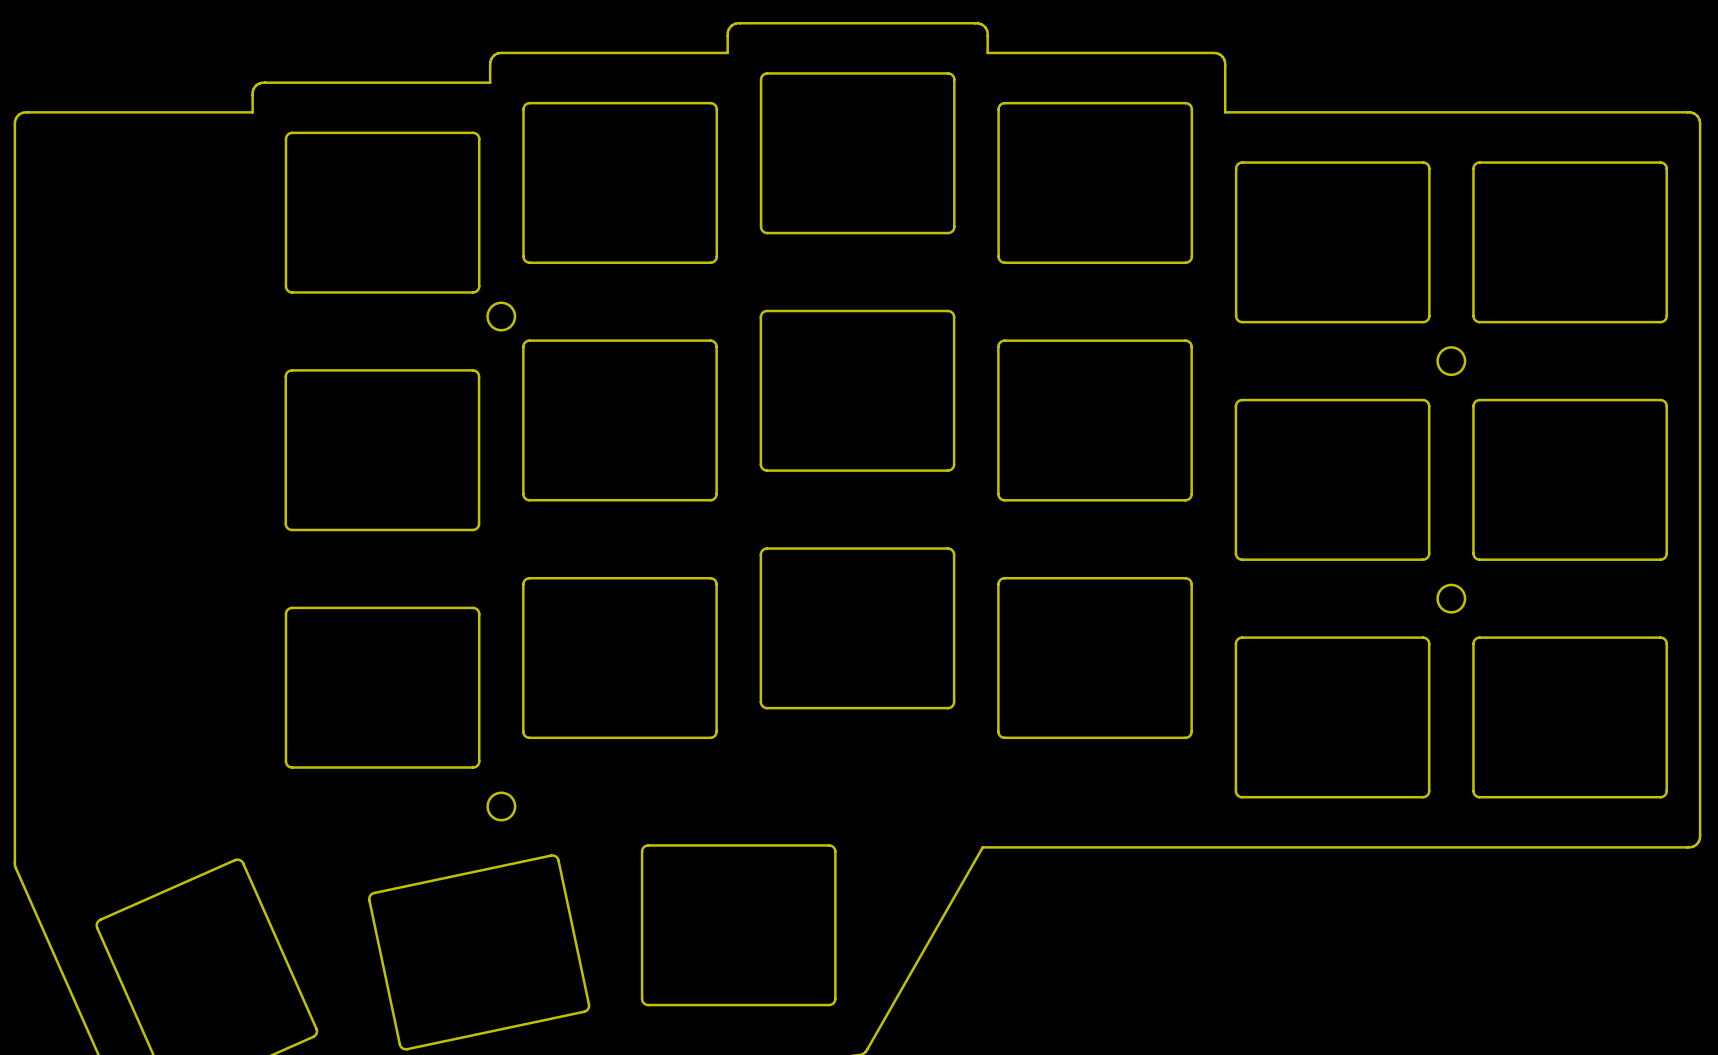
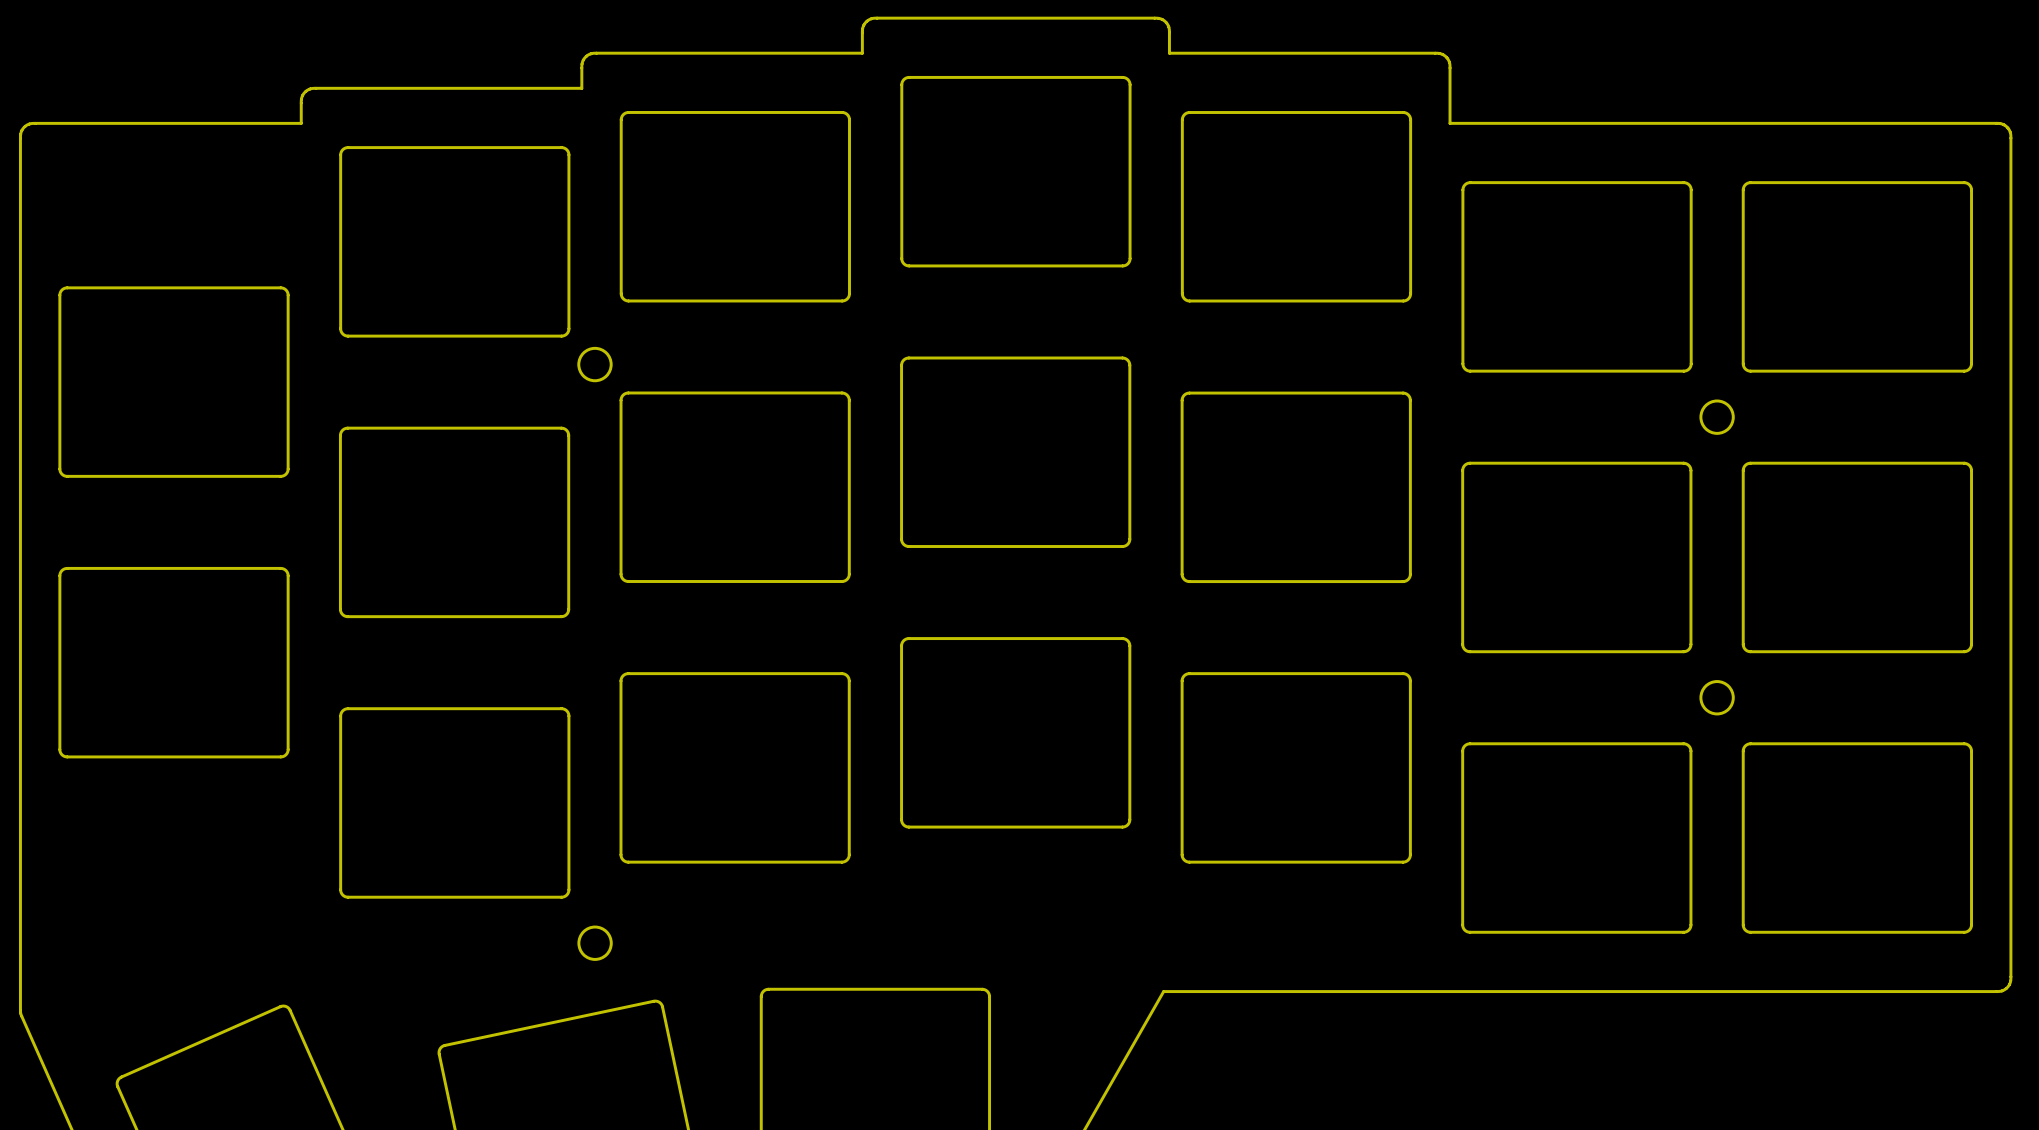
board edge: none -> (280, 287) (62, 289) (59, 295) (61, 473) (67, 476) (285, 474) (288, 469) (288, 295) (285, 290) (280, 287)
board edge: none -> (280, 568) (62, 569) (59, 575) (61, 754) (67, 756) (285, 755) (288, 749) (288, 575) (285, 570) (280, 568)

